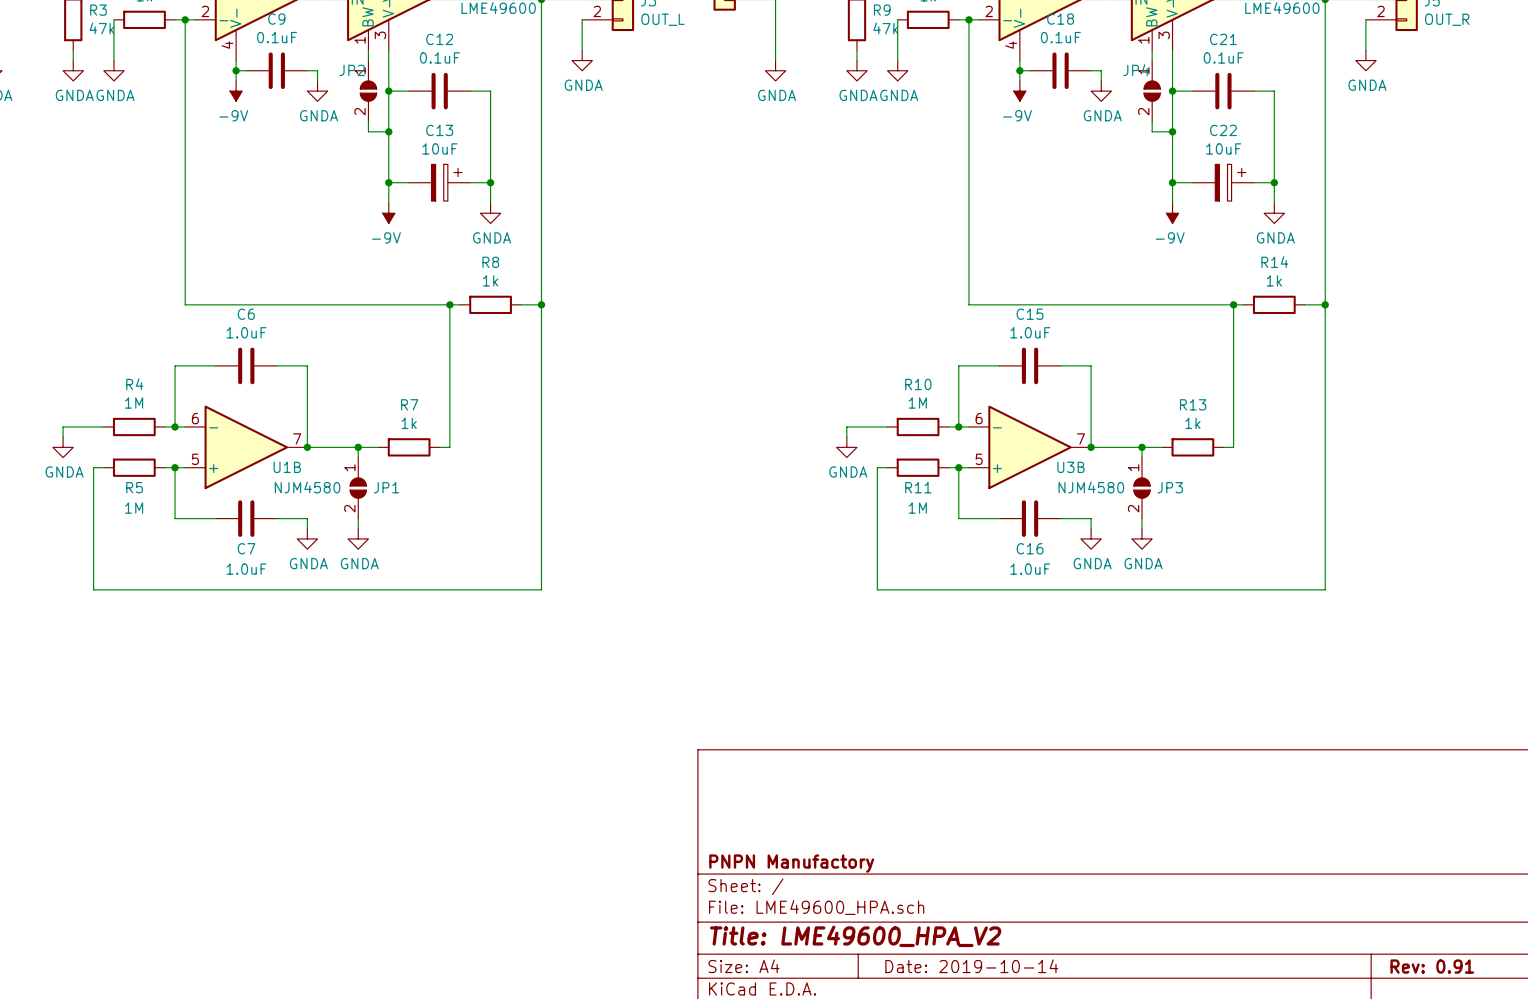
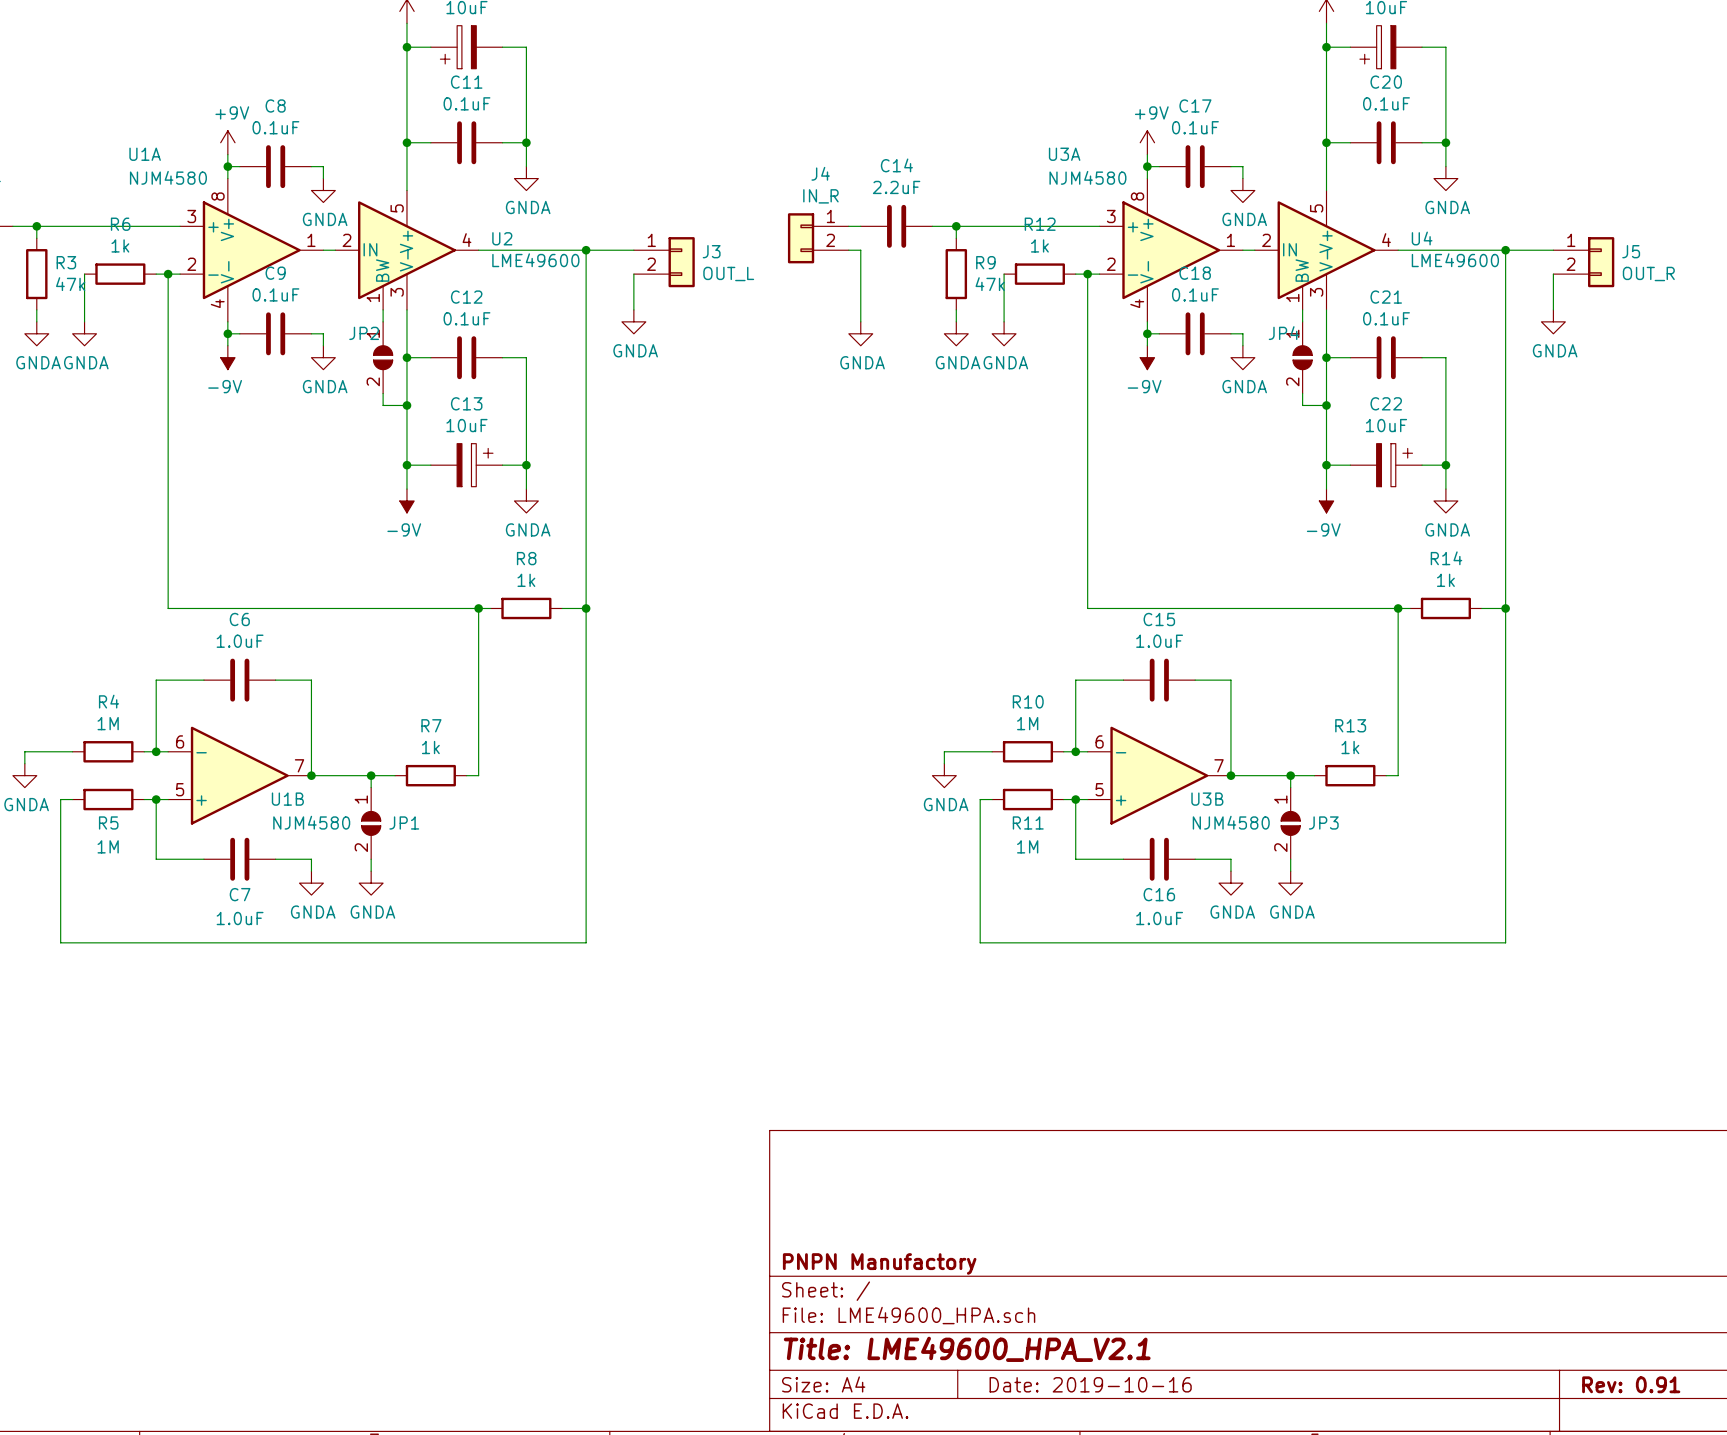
title block: Title: LME49600_HPA_V2 (855, 936) -> Title: LME49600_HPA_V2.1 (967, 1349)
title block: Date: 2019-10-14 (971, 966) -> Date: 2019-10-16 (1090, 1384)

